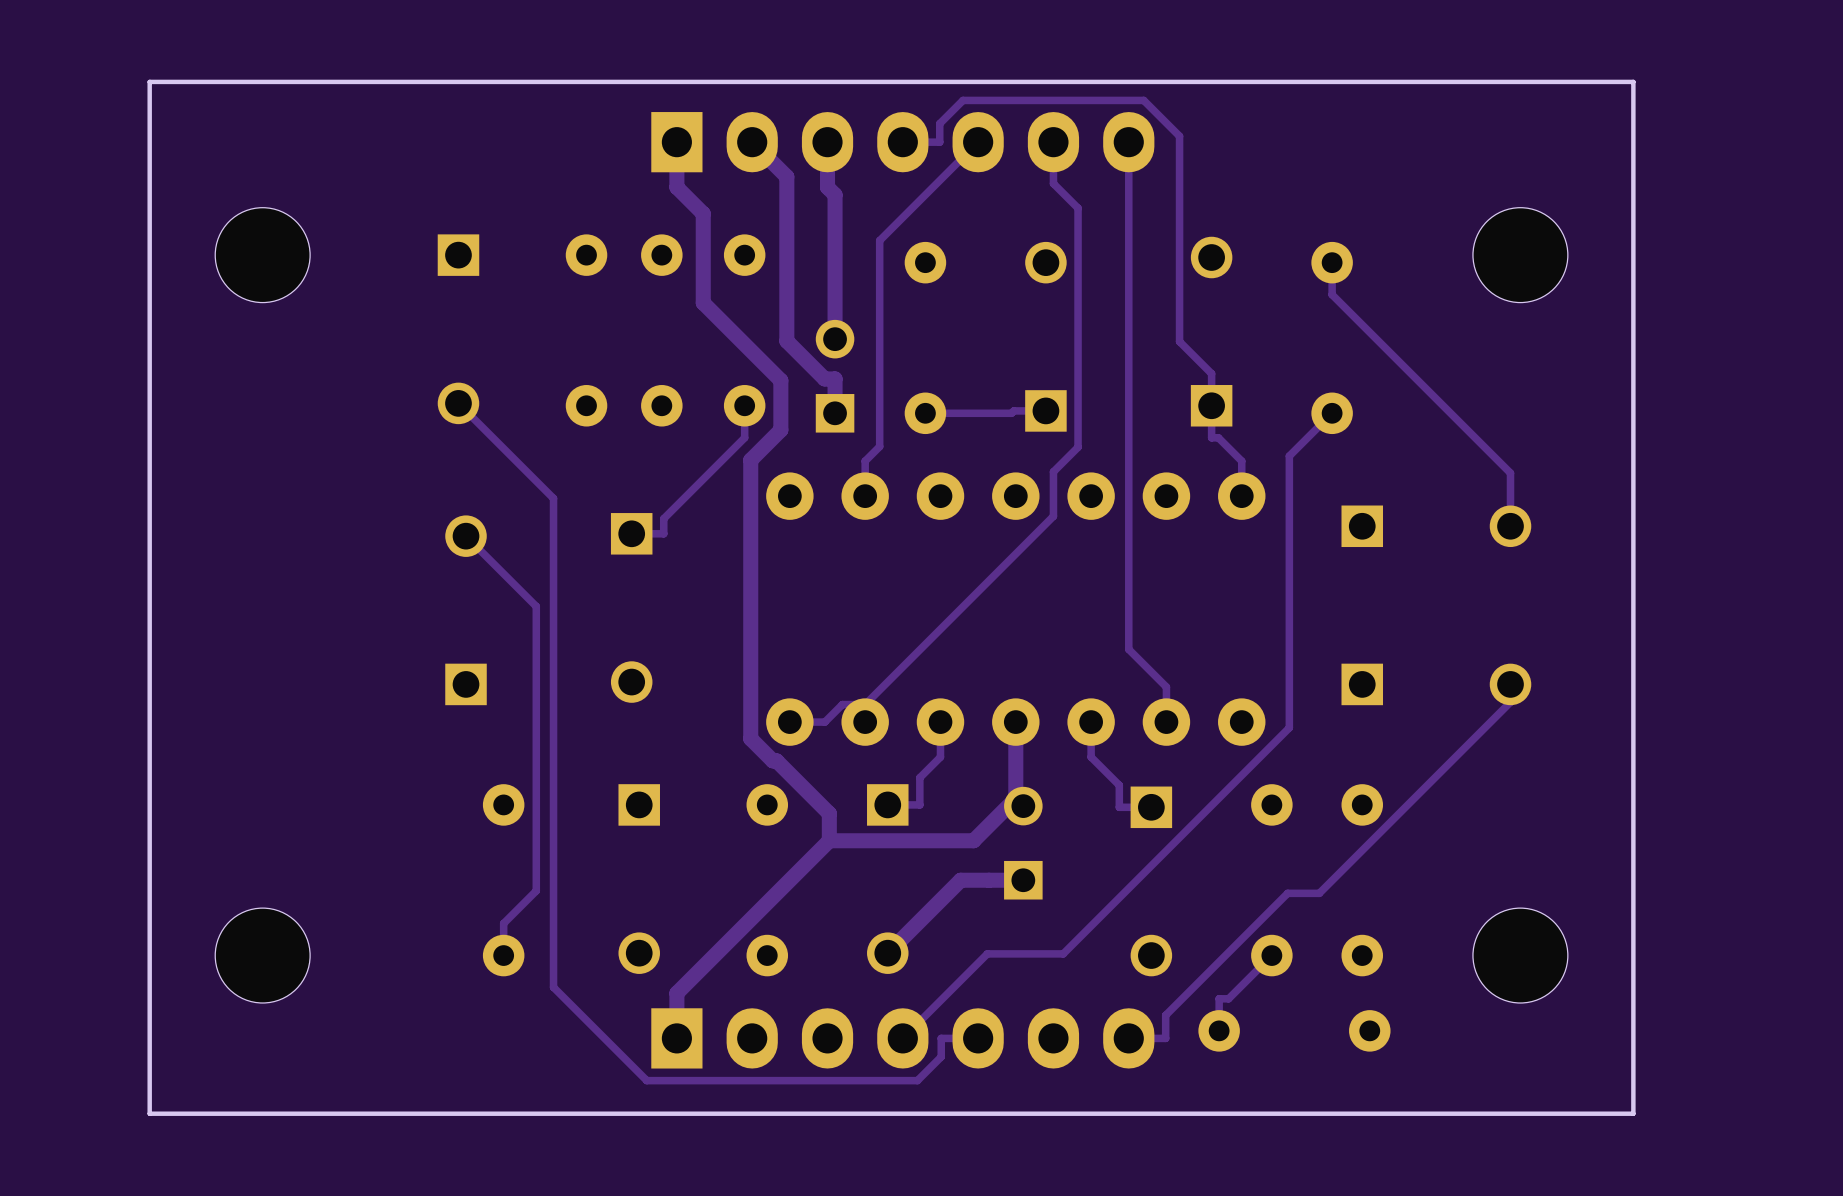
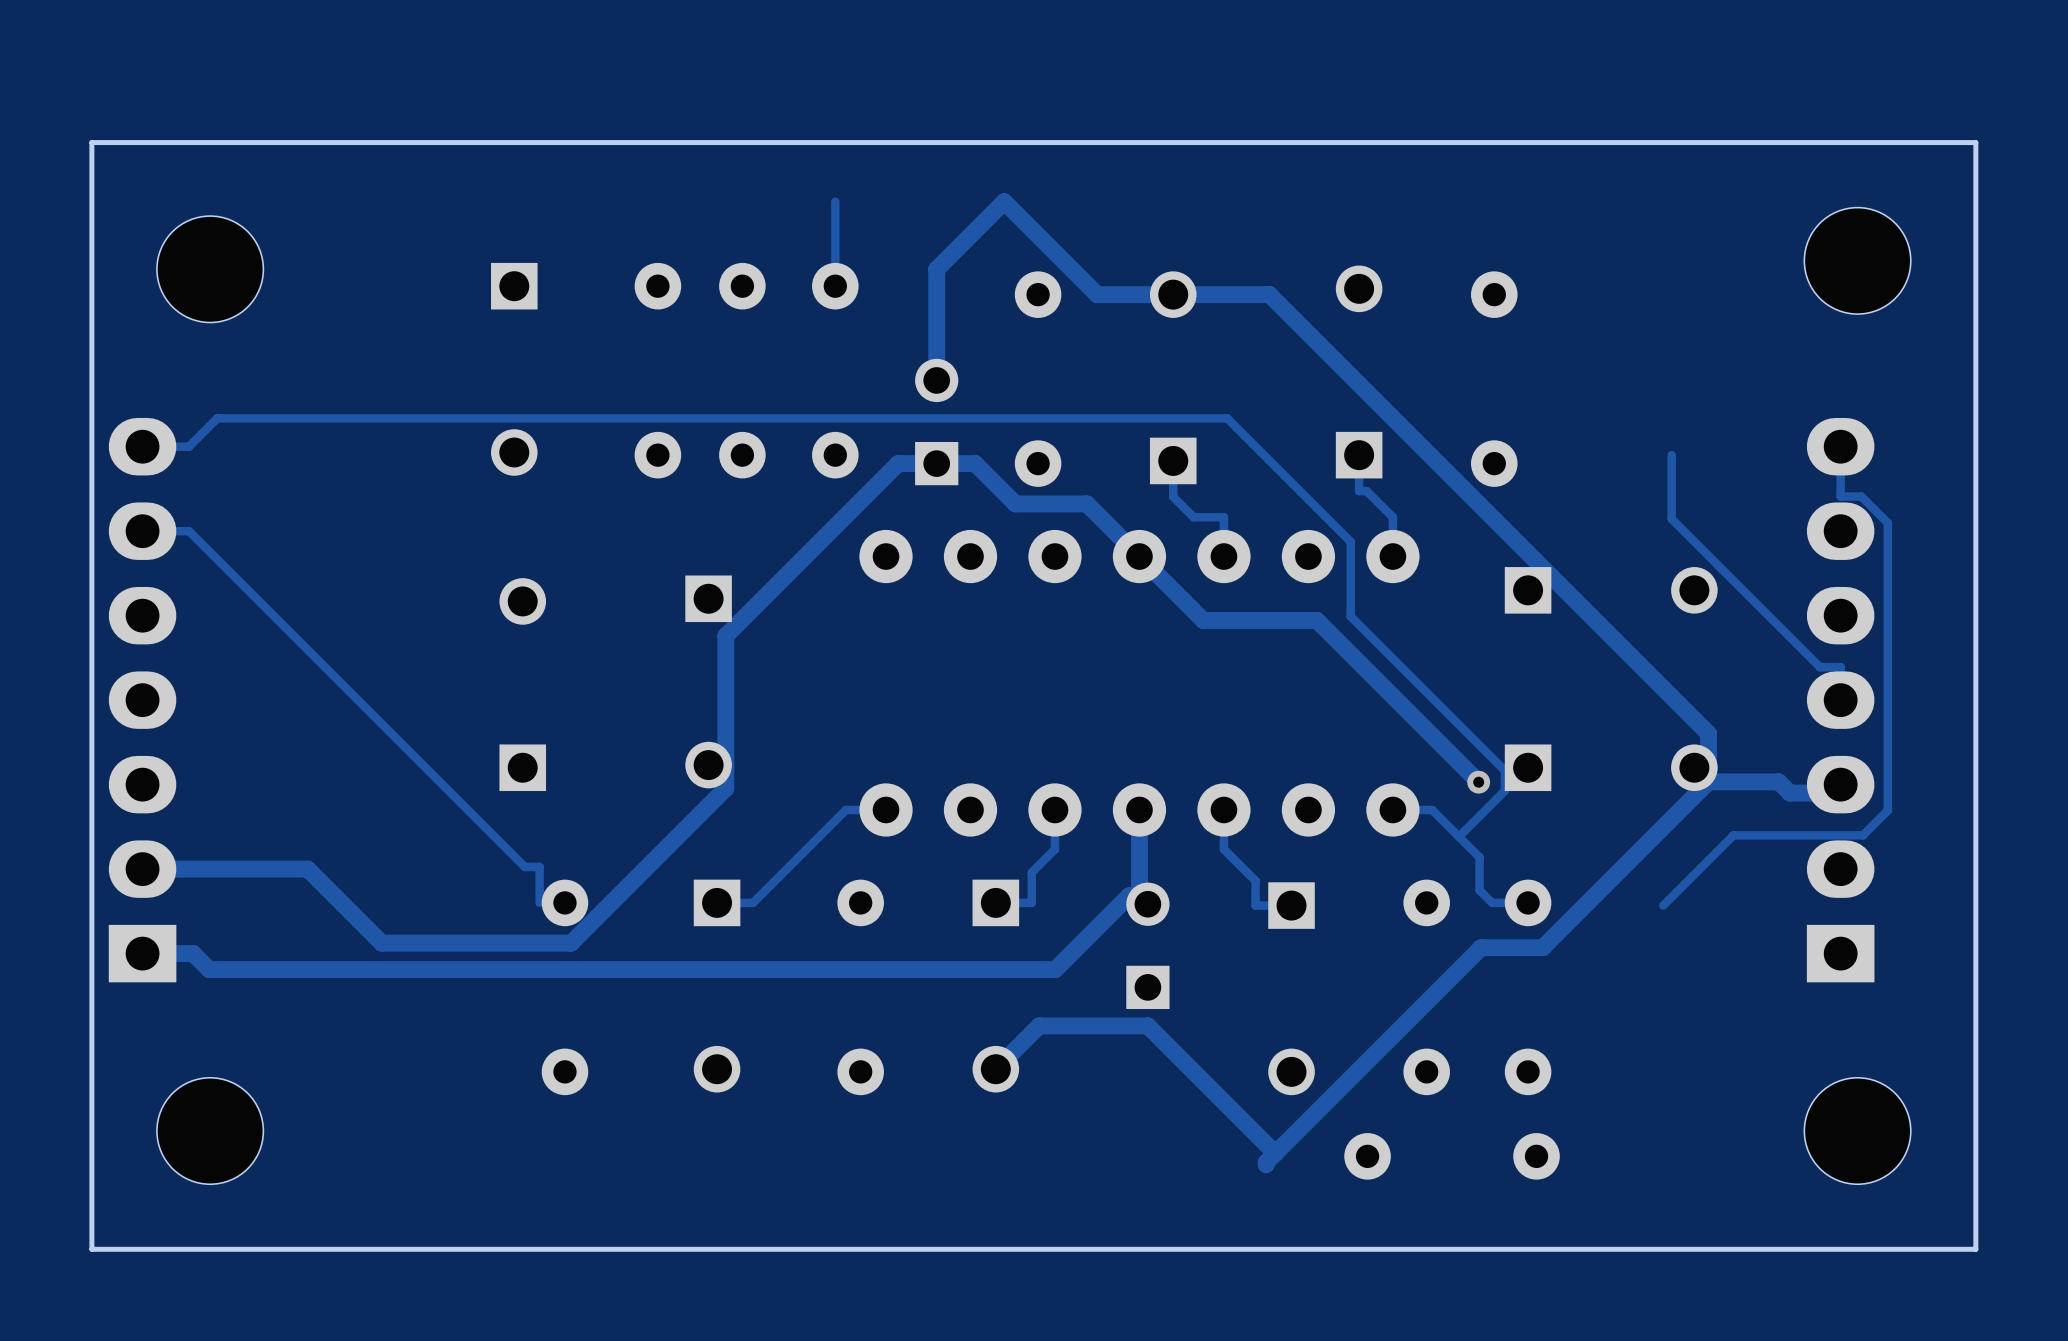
track: (676, 142) (676, 187) (703, 213) (703, 302) (780, 380) (780, 430) (750, 460) (750, 738) (772, 760) (776, 760) (829, 813) (829, 840) -> none
track: (752, 142) (786, 176) (786, 341) (824, 378) (835, 378) (835, 413) -> none
track: (827, 142) (827, 187) (835, 194) (835, 240) -> (1708, 781) (1708, 733) (1269, 294) (1097, 294) (1004, 201) (936, 269)
track: (902, 142) (939, 142) (939, 123) (963, 100) (1143, 100) (1179, 136) (1179, 341) (1211, 373) (1211, 405) -> none
part: (902, 142) -> none
track: (978, 142) (879, 240) (879, 446) (865, 461) (865, 496) -> none
track: (1053, 142) (1053, 183) (1078, 208) (1078, 447) (1053, 471) (1053, 516) (865, 704) -> none
track: (1128, 142) (1128, 649) (1166, 687) (1166, 722) -> none
track: none -> (835, 201) (835, 286)
part position: (262, 255) -> (210, 269)
part position: (1520, 255) -> (1857, 260)
track: (1332, 262) (1332, 294) (1510, 473) (1510, 526) -> none
track: none -> (142, 446) (189, 446) (217, 418) (1227, 418) (1350, 541) (1350, 616) (1504, 770) (1504, 790) (1458, 836)
track: none -> (1840, 446) (1840, 496) (1861, 496) (1887, 523) (1887, 810) (1862, 835) (1733, 835) (1663, 905)
track: (458, 403) (553, 498) (553, 987) (646, 1080) (917, 1080) (941, 1056) (941, 1038) (978, 1038) -> none
track: (744, 405) (744, 437) (663, 518) (663, 533) (631, 533) -> none
track: none -> (1671, 455) (1671, 518) (1819, 667) (1840, 667) (1840, 708)
track: (1045, 410) (1013, 410) (1011, 413) (925, 413) -> (1173, 460) (1173, 496) (1193, 517) (1223, 517) (1223, 556)
track: (1332, 413) (1289, 456) (1289, 727) (1063, 953) (987, 953) (902, 1038) -> none
track: none -> (142, 531) (189, 531) (524, 866) (539, 866) (539, 902)
track: (466, 536) (536, 606) (536, 890) (503, 923) (503, 955) -> none
part: none -> (142, 700)
part: none -> (1840, 700)
track: (1510, 684) (1510, 702) (1319, 893) (1287, 893) (1165, 1015) (1165, 1038) (1128, 1038) -> (1275, 1153) (1266, 1164)
track: none -> (1478, 782) (1316, 620) (1203, 620) (1086, 503) (1015, 503) (975, 463) (898, 463) (725, 636) (725, 788) (571, 943) (381, 943) (307, 869) (142, 869)
via: none -> (1478, 782)
track: none -> (1708, 781) (1542, 947) (1481, 947) (1275, 1153)
track: none -> (1708, 781) (1778, 781) (1789, 793) (1840, 793)
track: (865, 704) (842, 704) (824, 722) (789, 722) -> (717, 902) (753, 902) (845, 809) (886, 809)
track: none -> (1392, 809) (1432, 809) (1458, 836)
track: none -> (1458, 836) (1479, 857) (1479, 890) (1492, 902) (1528, 902)
track: (1015, 798) (973, 840) (829, 840) -> (1139, 895) (1129, 895) (1055, 969) (209, 969) (193, 953) (142, 953)
track: (829, 840) (676, 993) (676, 1038) -> none
track: (1023, 880) (960, 880) (887, 953) -> (1275, 1153) (1147, 1025) (1039, 1025) (995, 1069)
part position: (262, 955) -> (210, 1131)
track: (1271, 955) (1228, 998) (1219, 998) (1219, 1030) -> none
part position: (1520, 955) -> (1857, 1131)
part: (902, 1038) -> none
board edge: (1633, 1113) (1633, 81) (149, 81) (149, 1113) -> (1832, 1249) (1975, 1249) (1975, 142) (91, 142) (91, 1249) (167, 1249)

